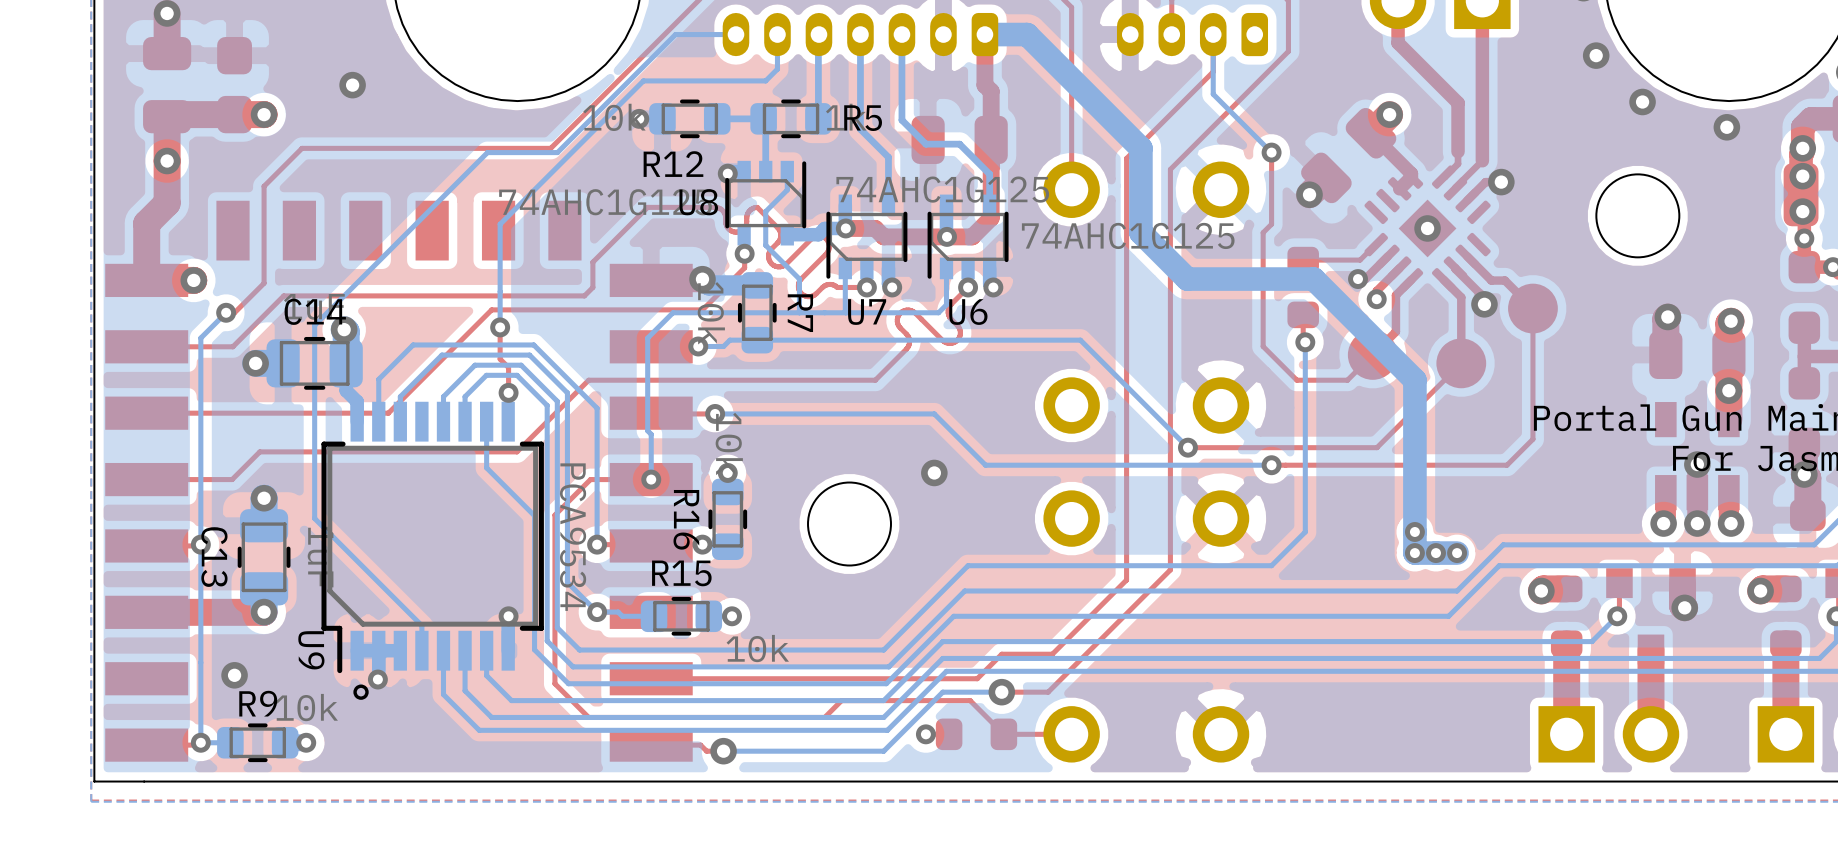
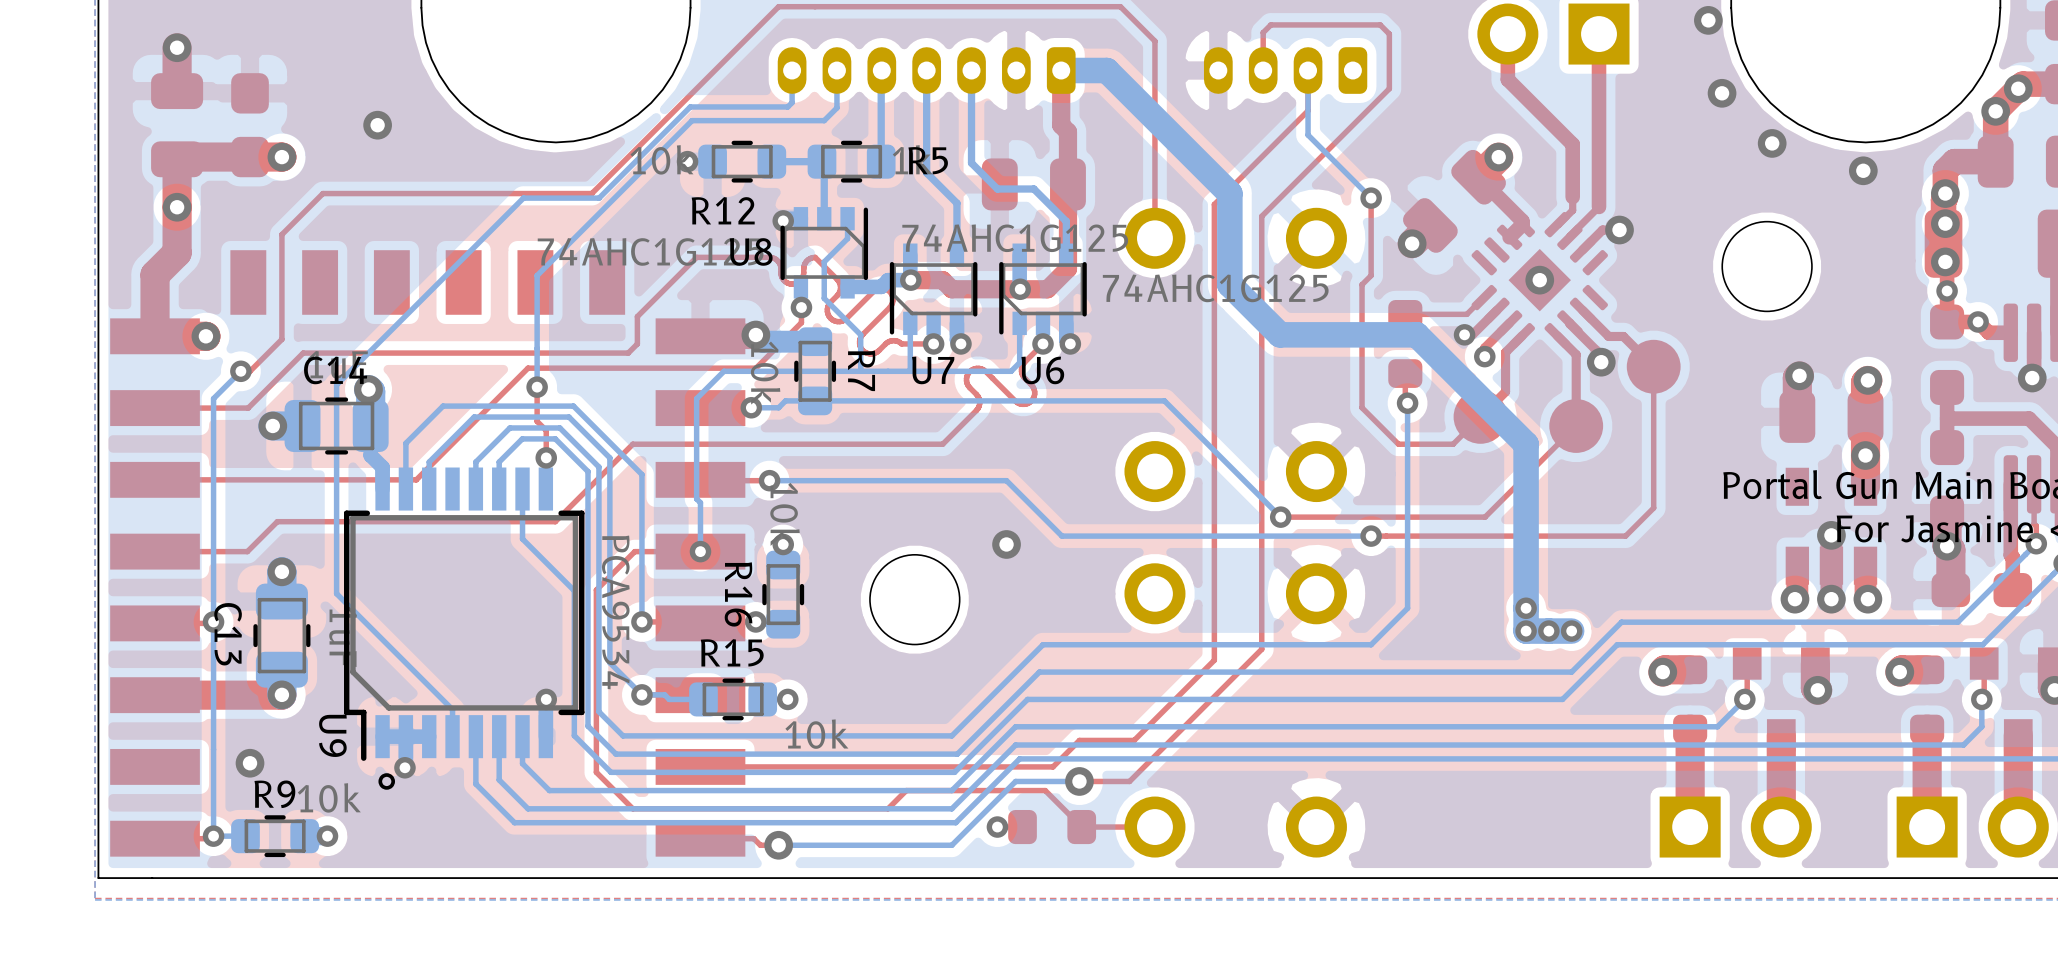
bottom track: (735, 34) (675, 34) (641, 68) -> (792, 70) (792, 102) (787, 106) (690, 106)

